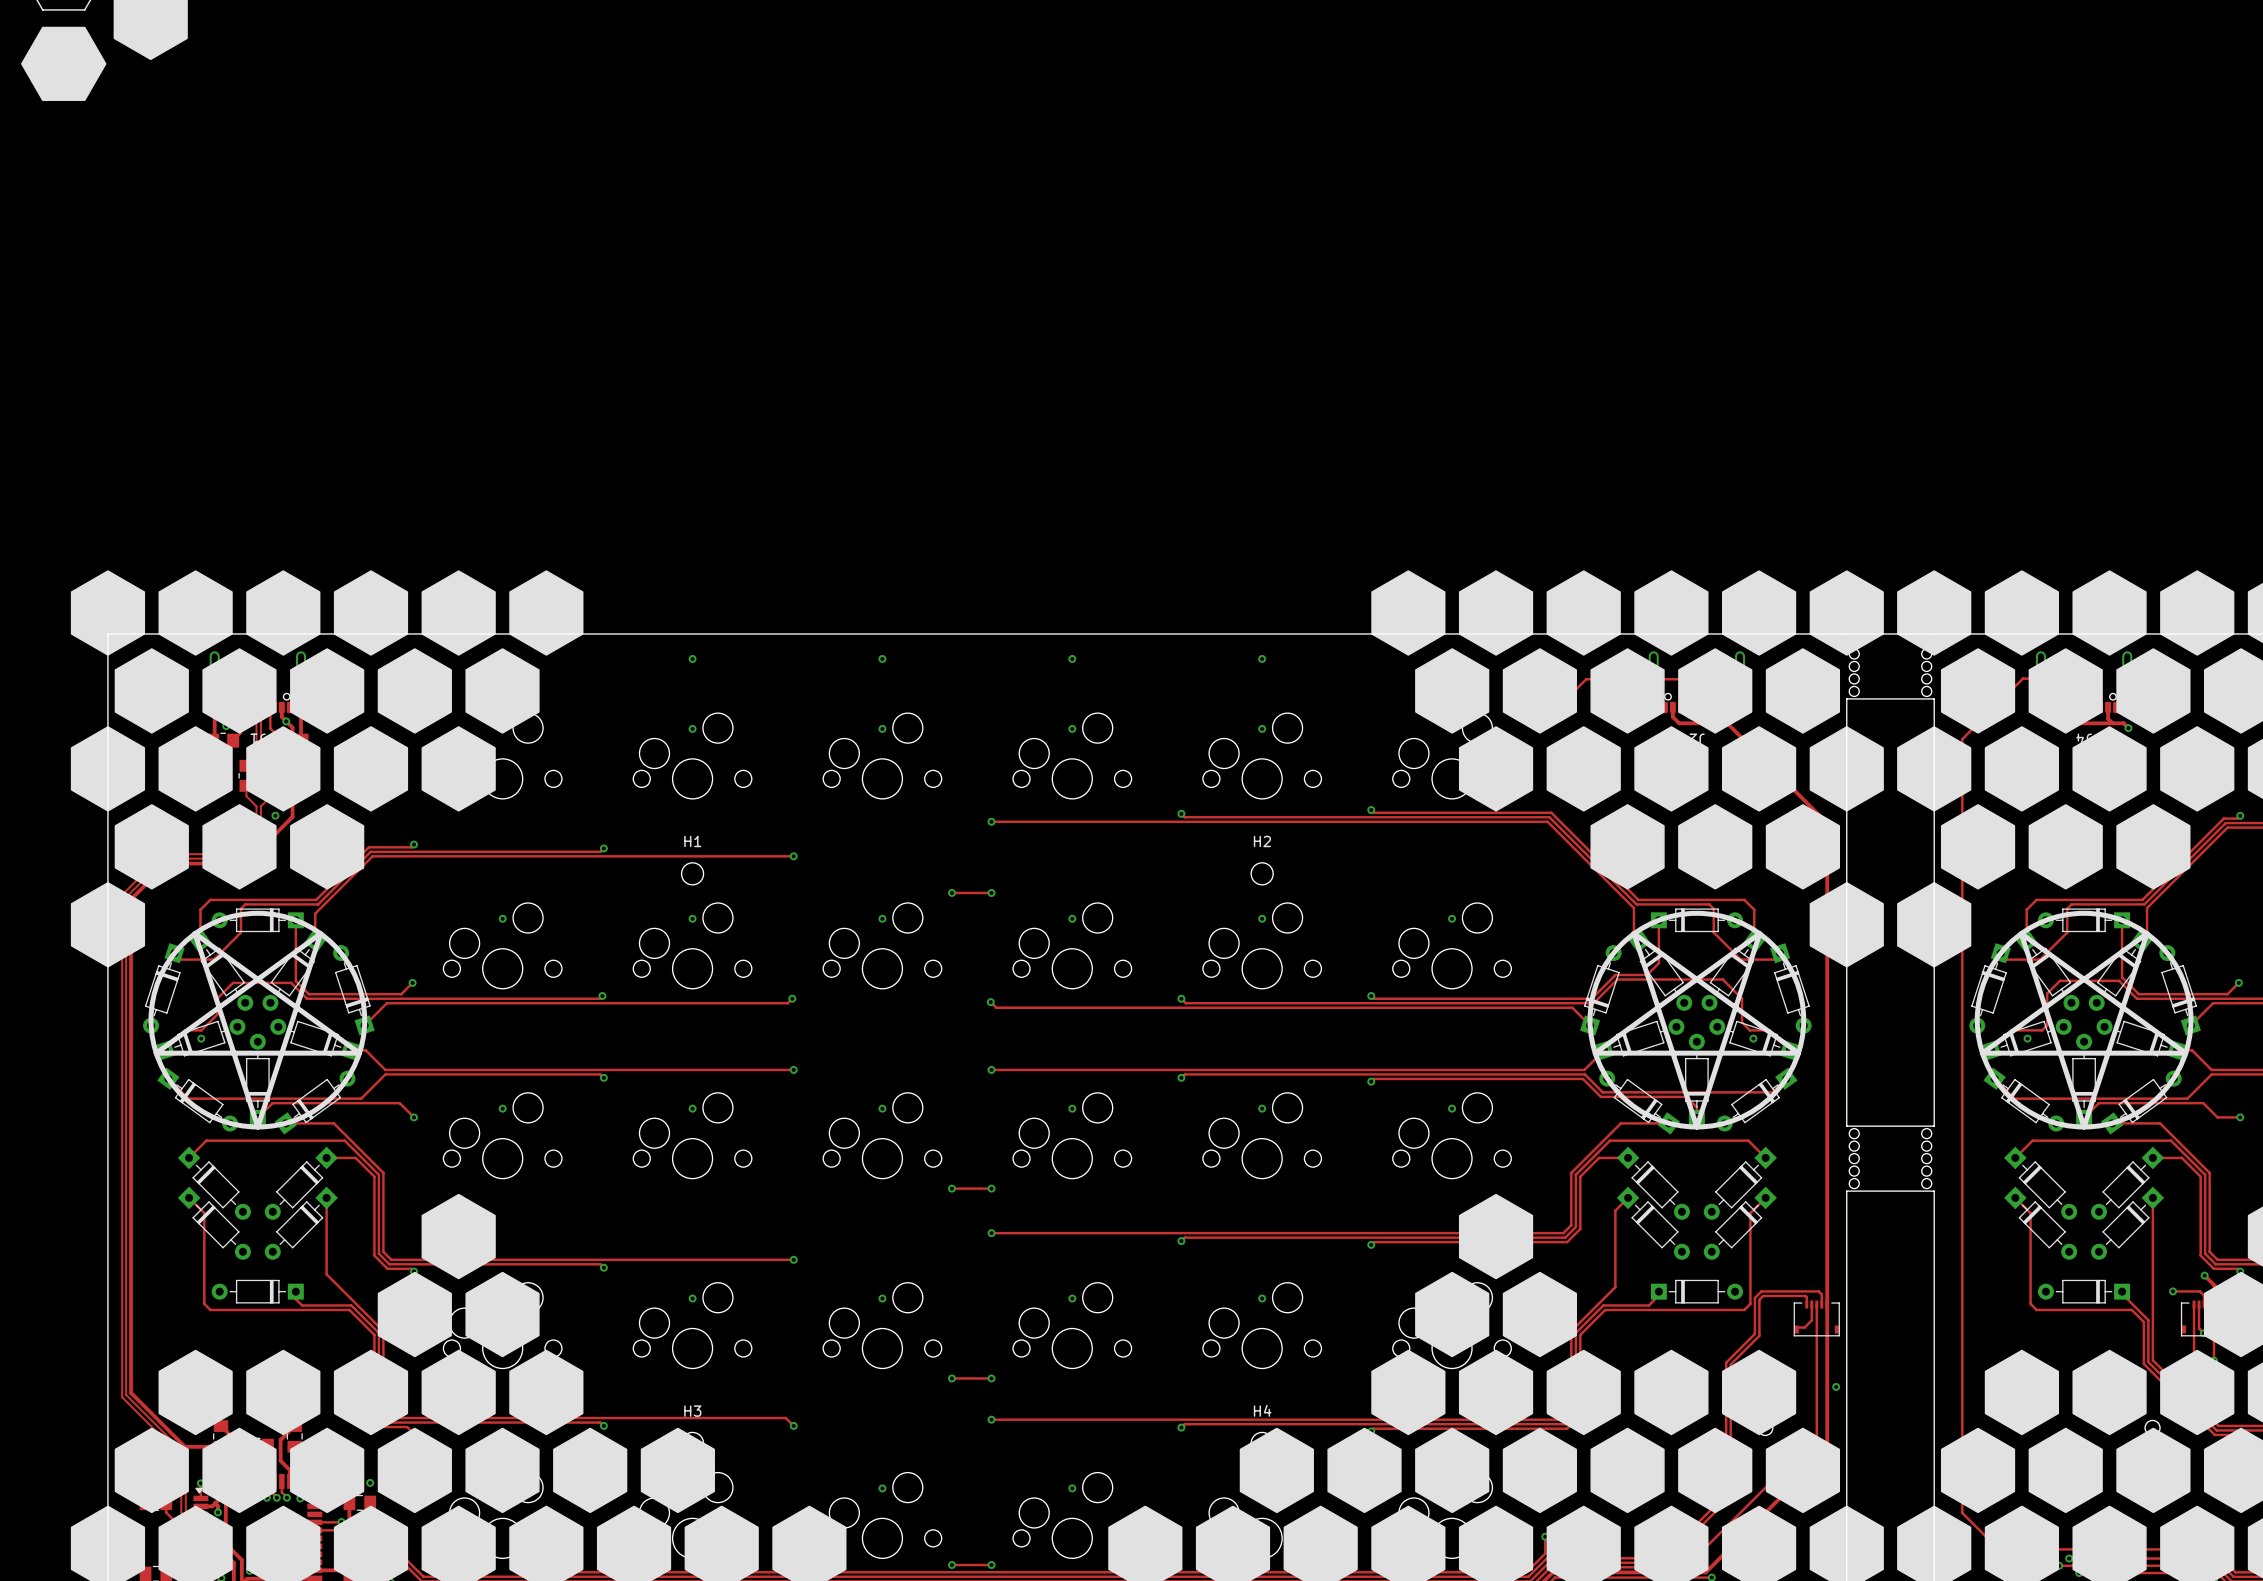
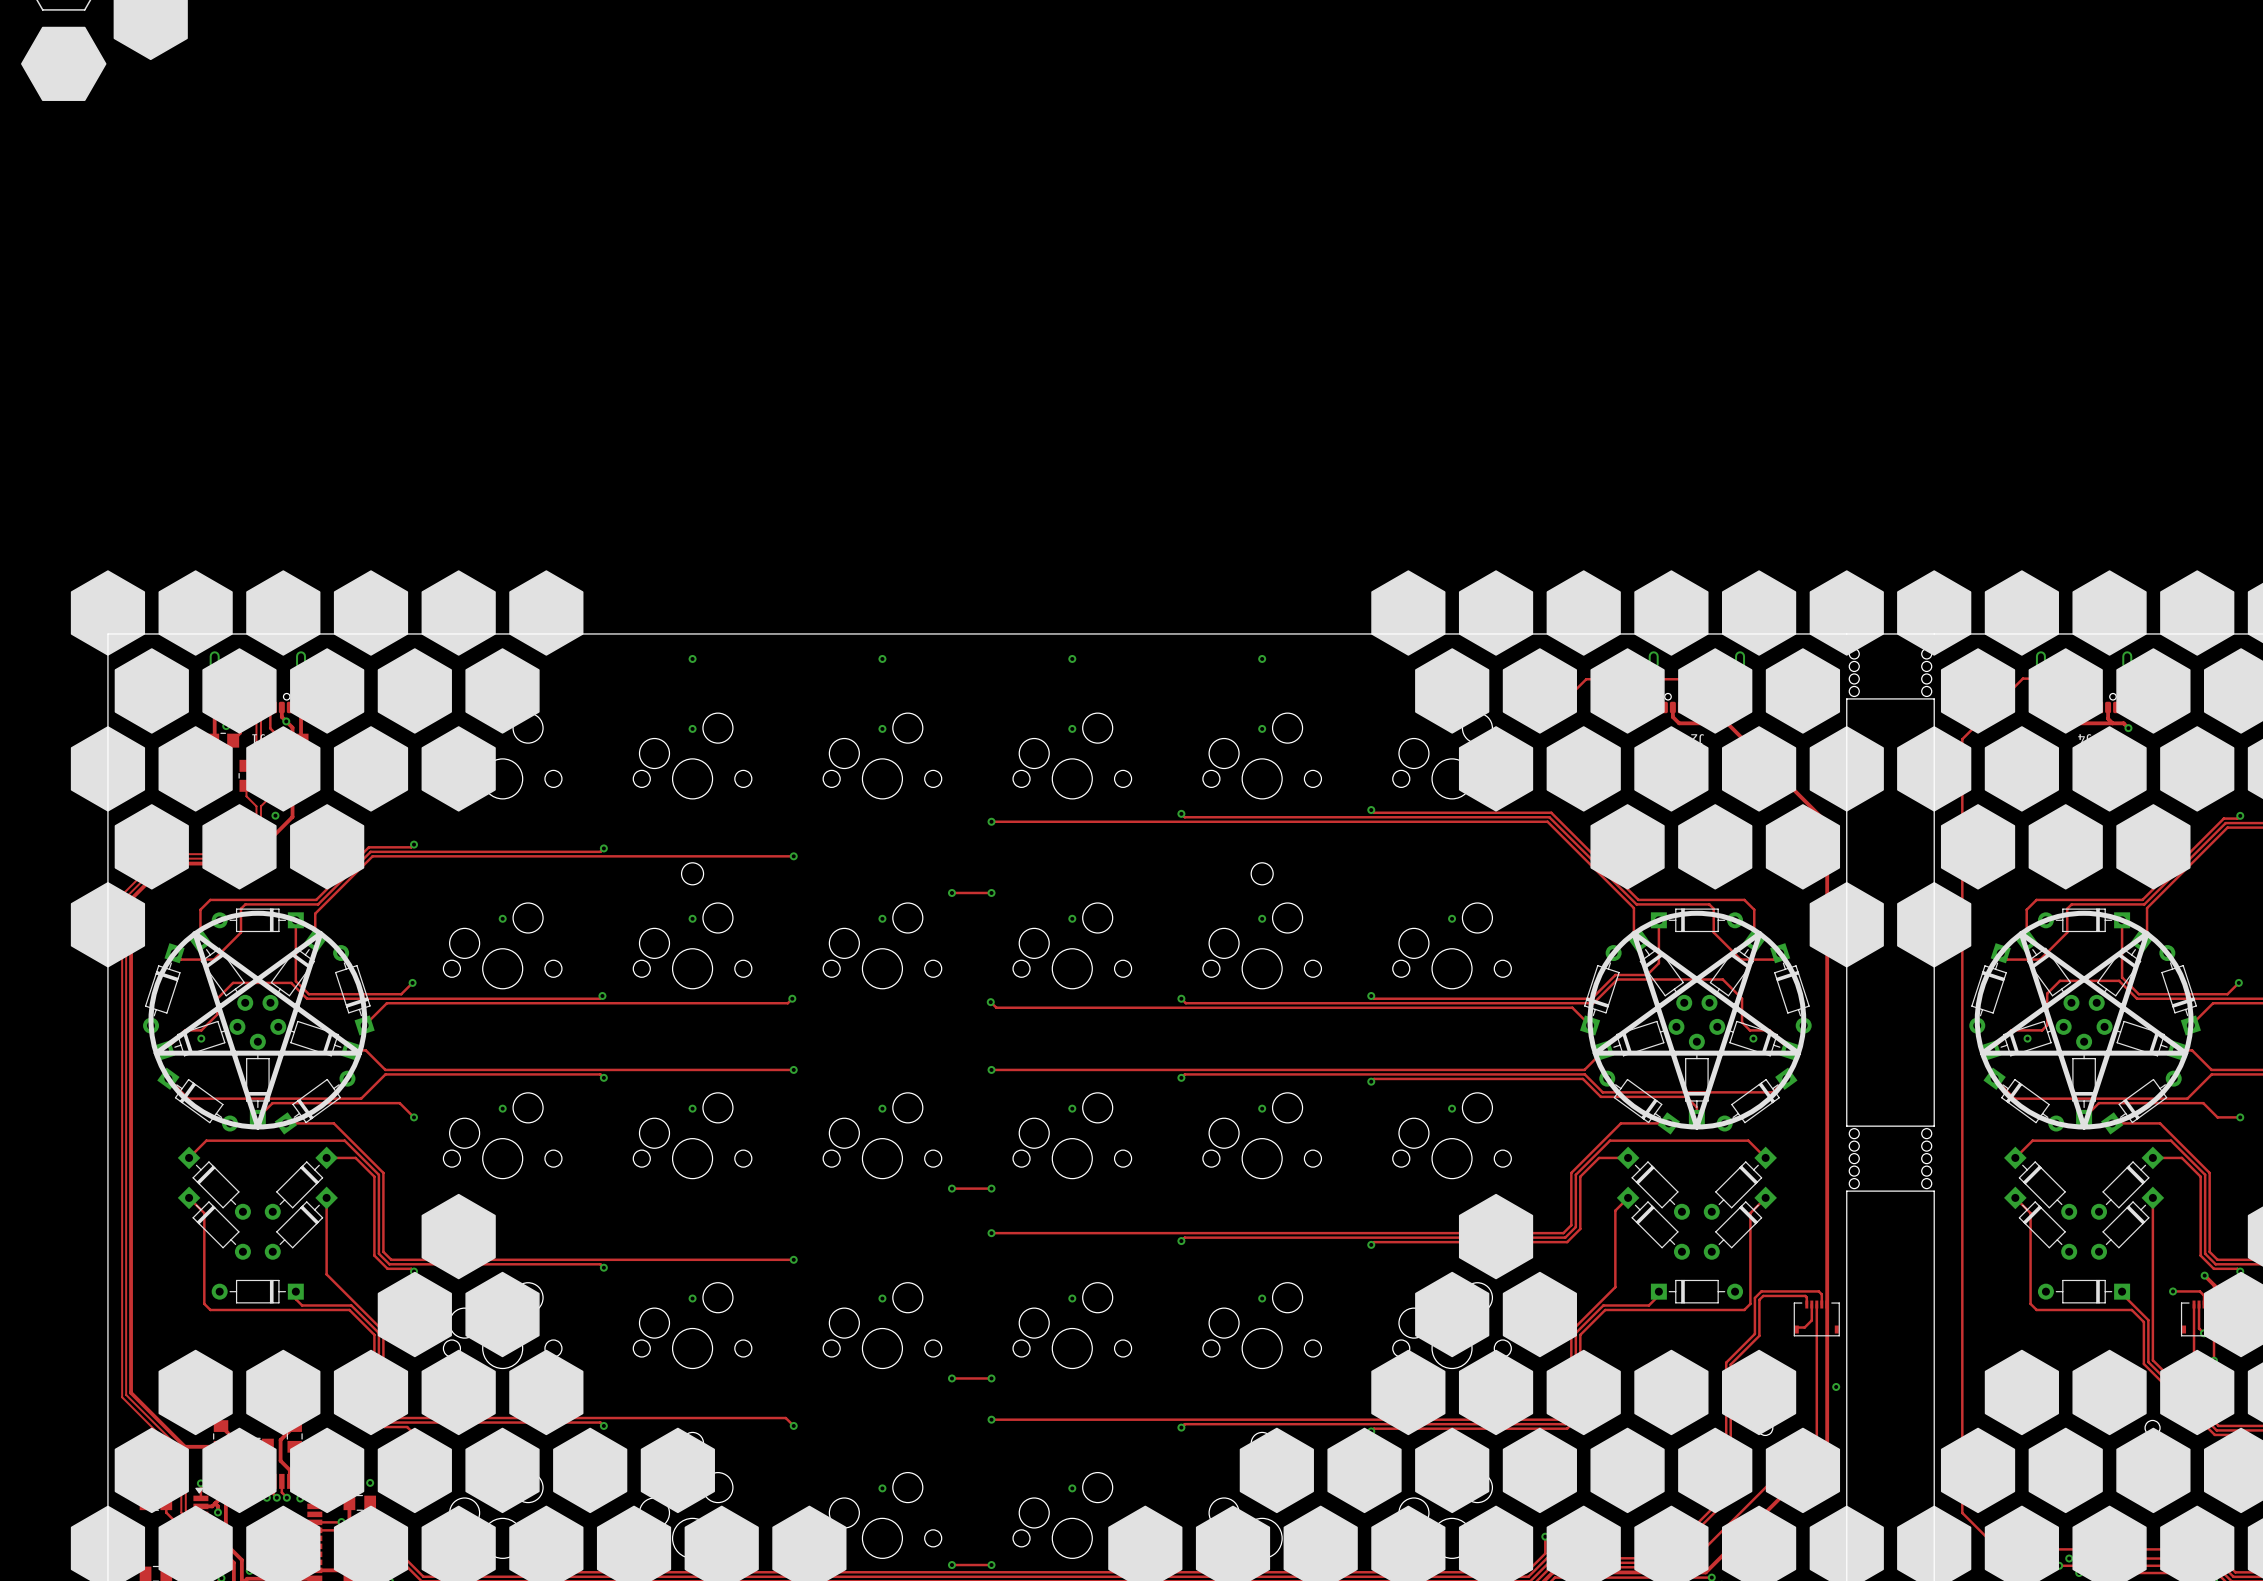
H1 name: H1 (692, 841) -> none
H2 name: H2 (1262, 841) -> none
H4 name: H4 (1262, 1410) -> none
H3 name: H3 (692, 1411) -> none

